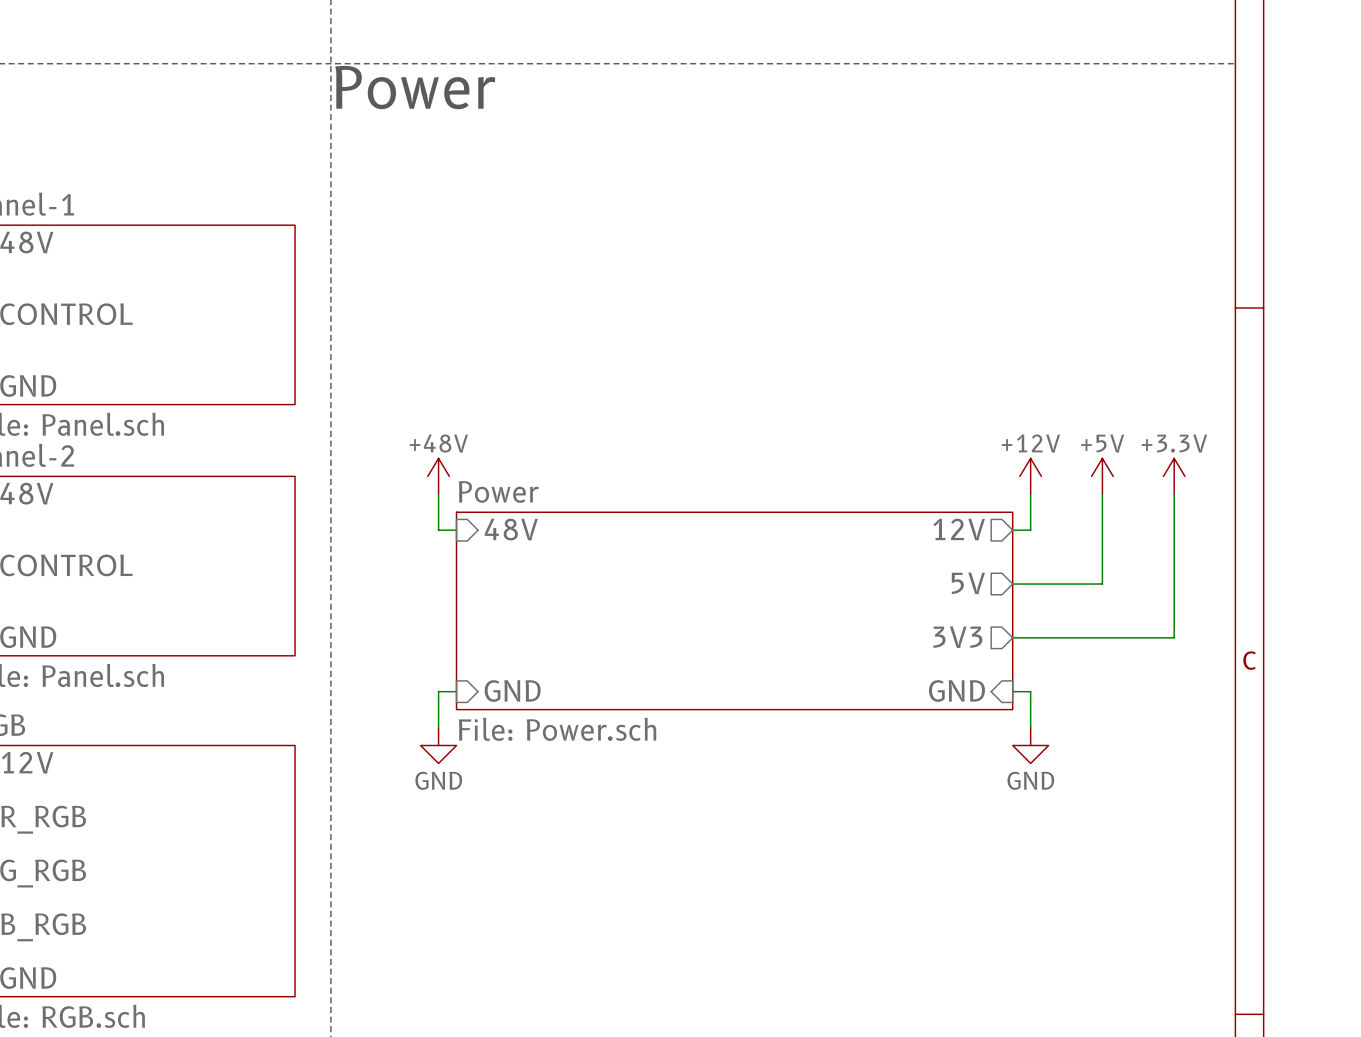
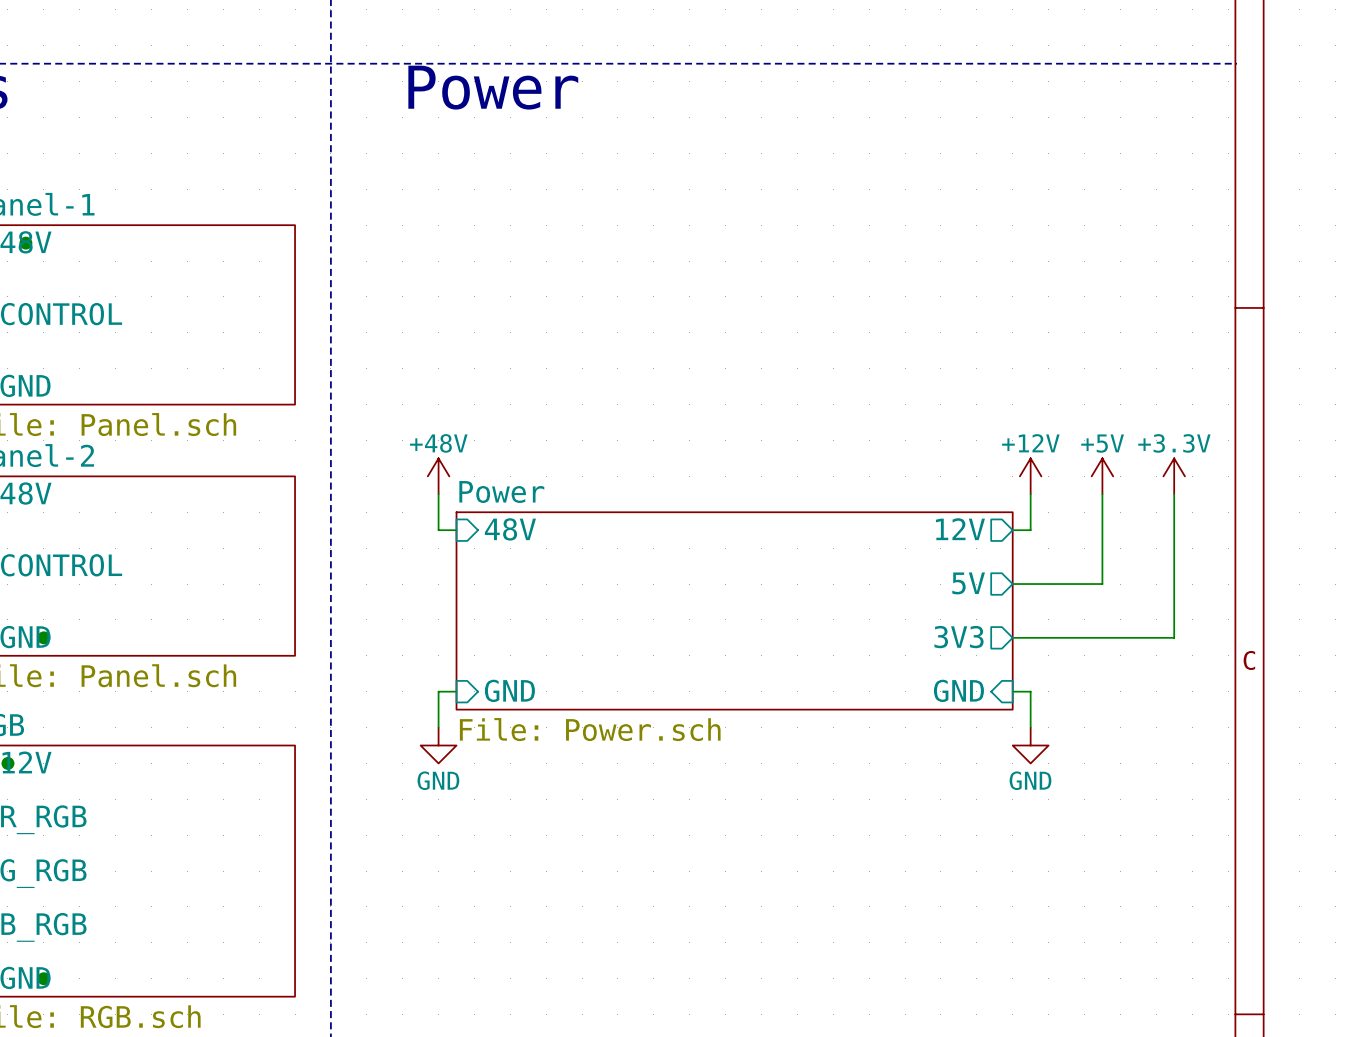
text position: Power (415, 87) -> Power (493, 87)
junction: none -> (25, 243)
junction: none -> (43, 637)
junction: none -> (7, 763)
junction: none -> (43, 978)

